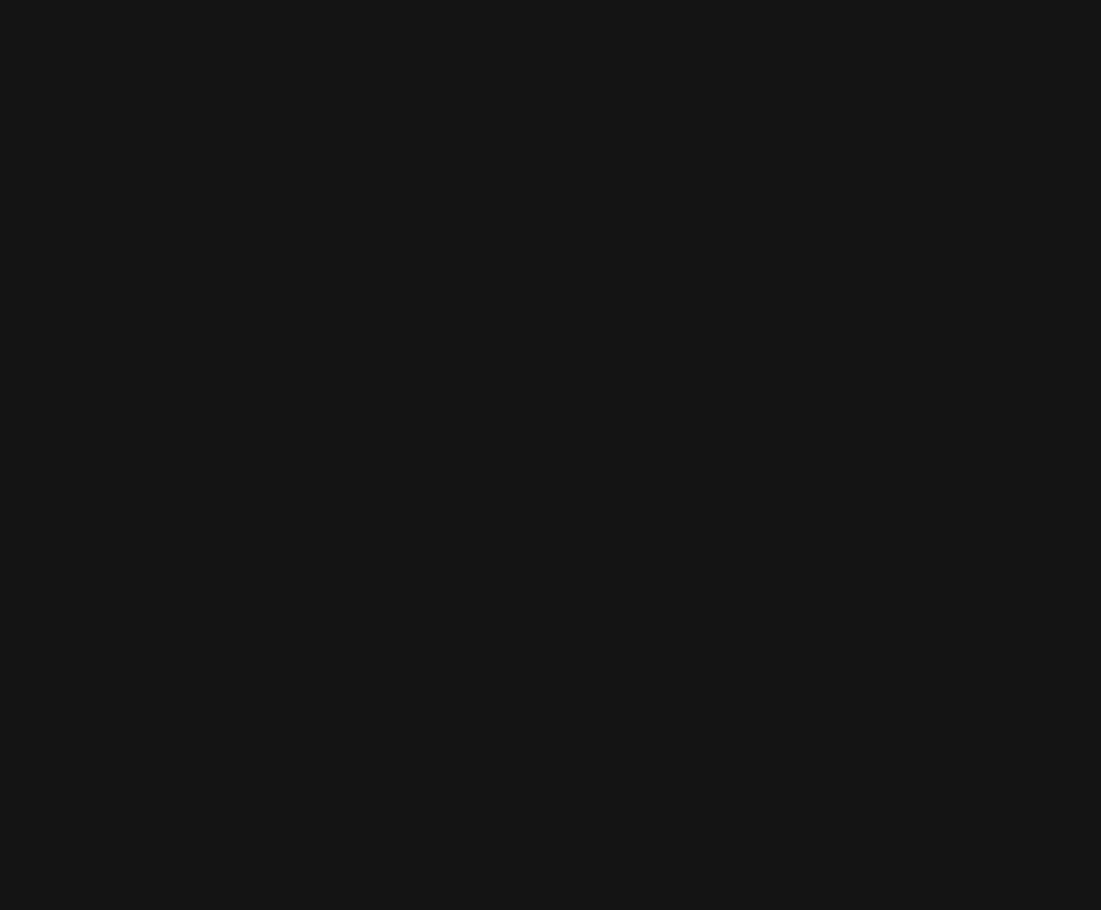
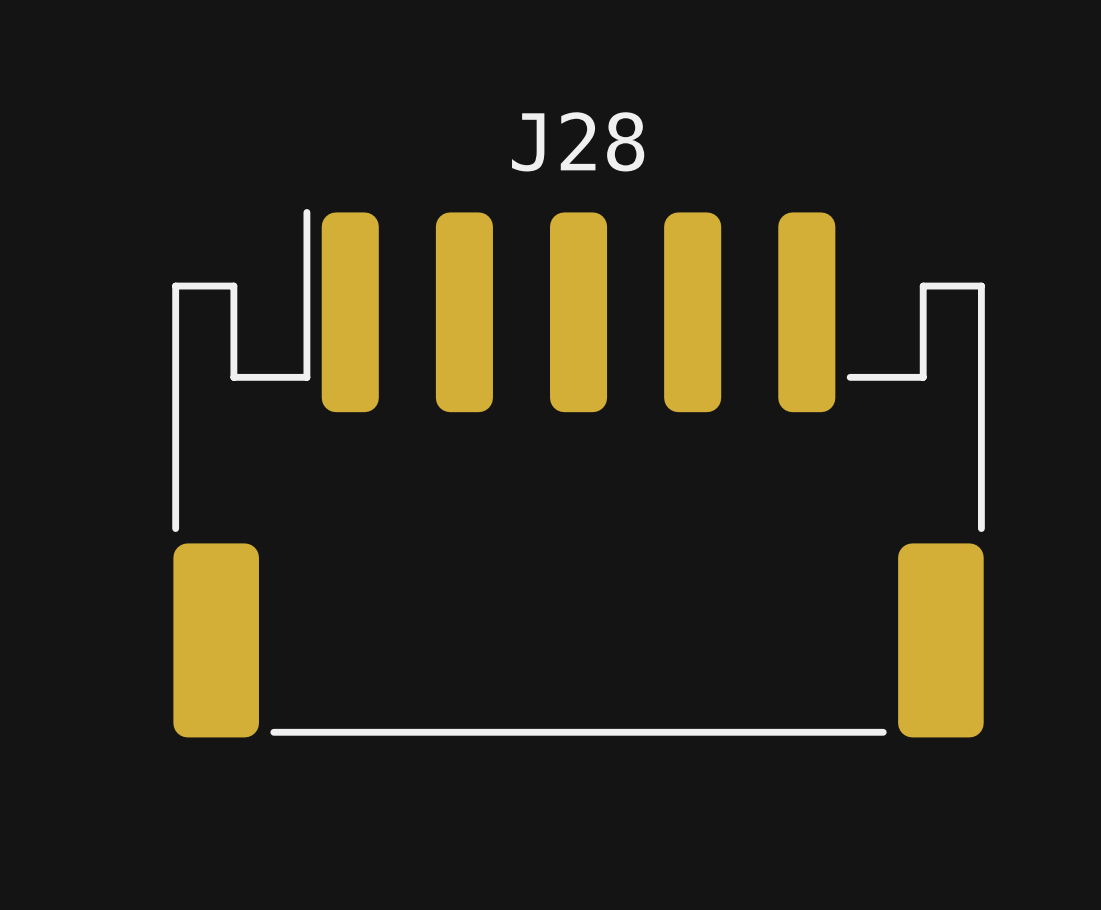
J28: none -> (578, 473)

